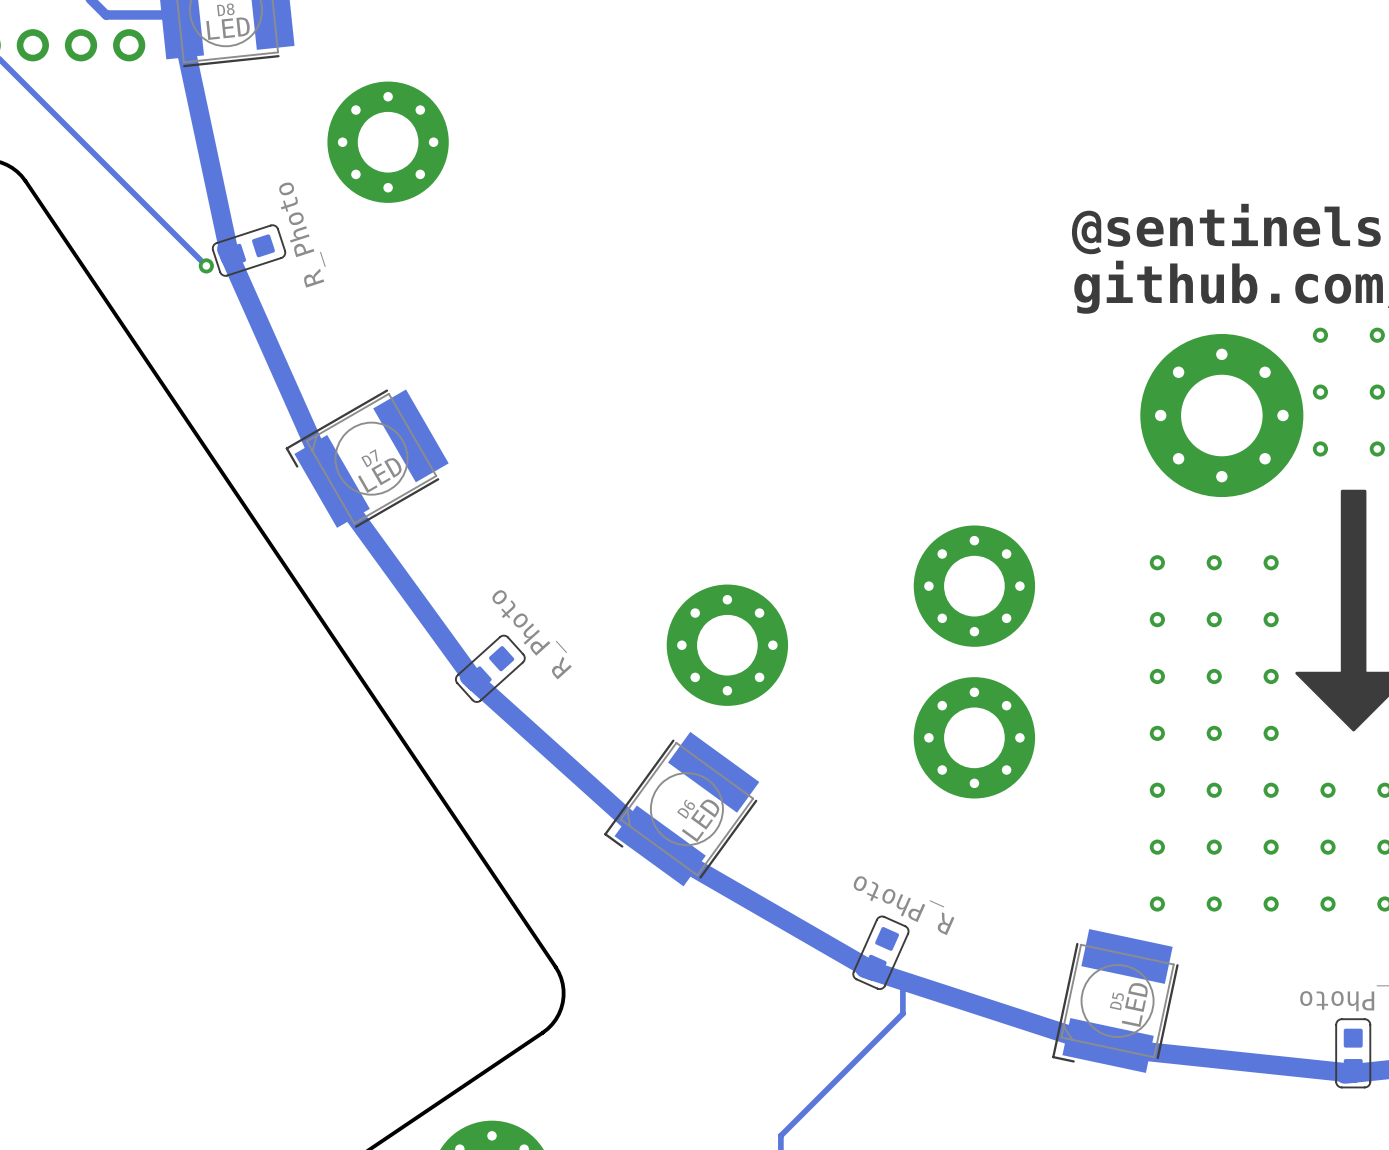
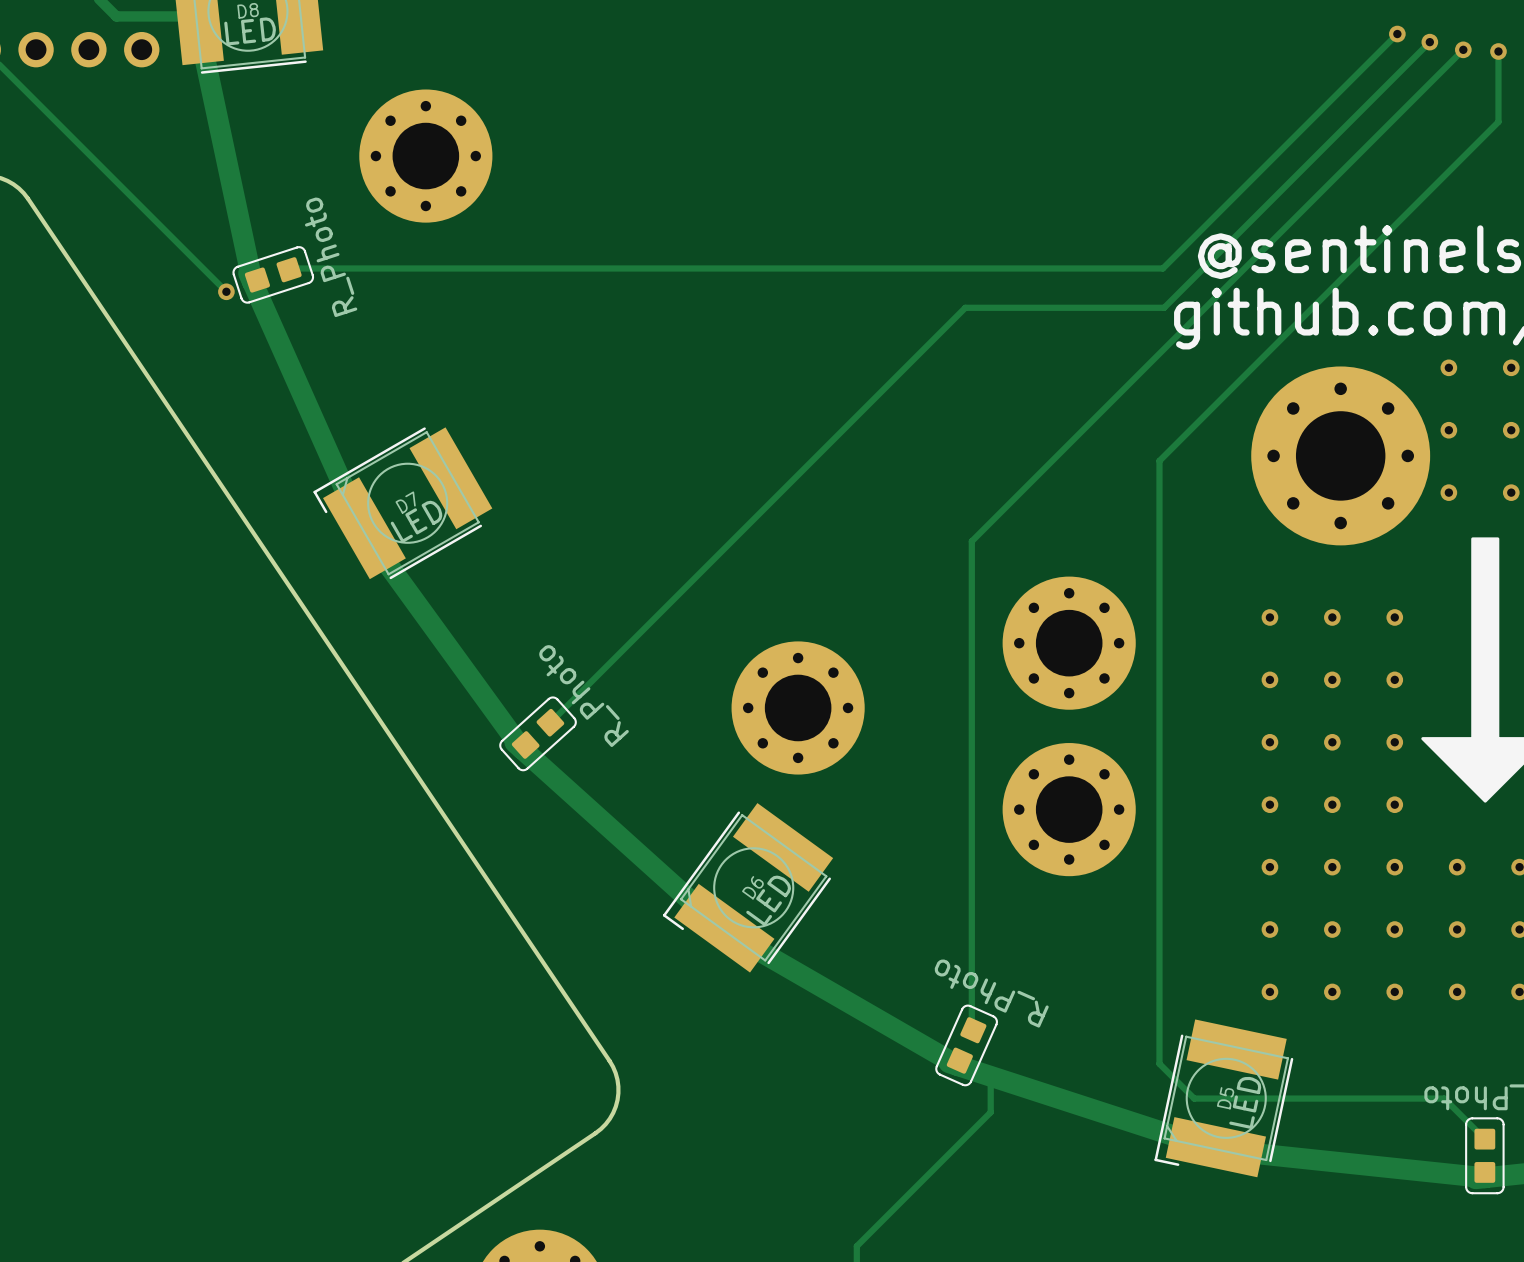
track: none -> (1397, 34) (1162, 268) (289, 269)
via: none -> (1397, 34)
track: none -> (1429, 42) (1164, 307) (965, 307) (550, 722)
via: none -> (1429, 42)
track: none -> (1463, 49) (971, 541) (971, 1028)
via: none -> (1463, 49)
track: none -> (1498, 51) (1498, 121) (1159, 460) (1159, 1063) (1194, 1098) (1444, 1098) (1484, 1139)
via: none -> (1498, 51)

